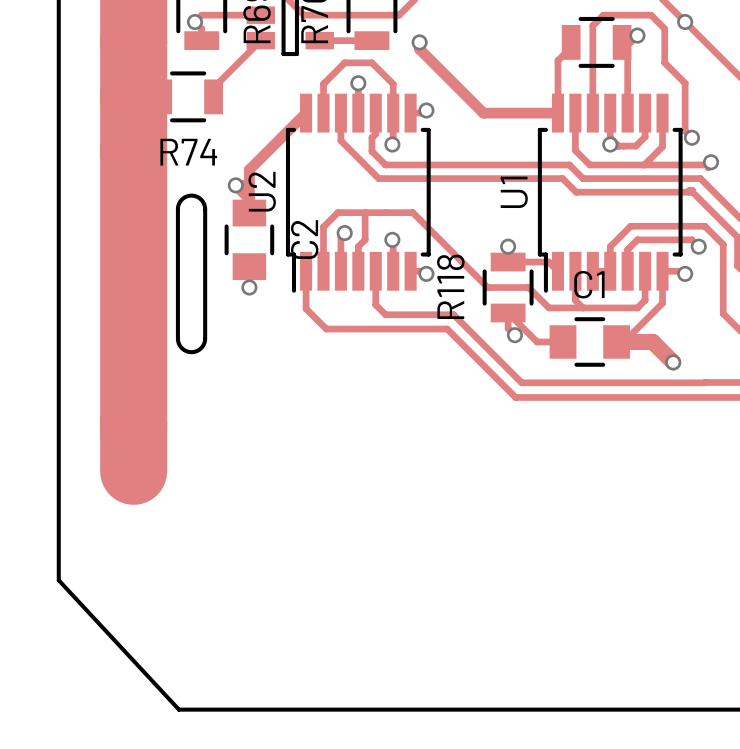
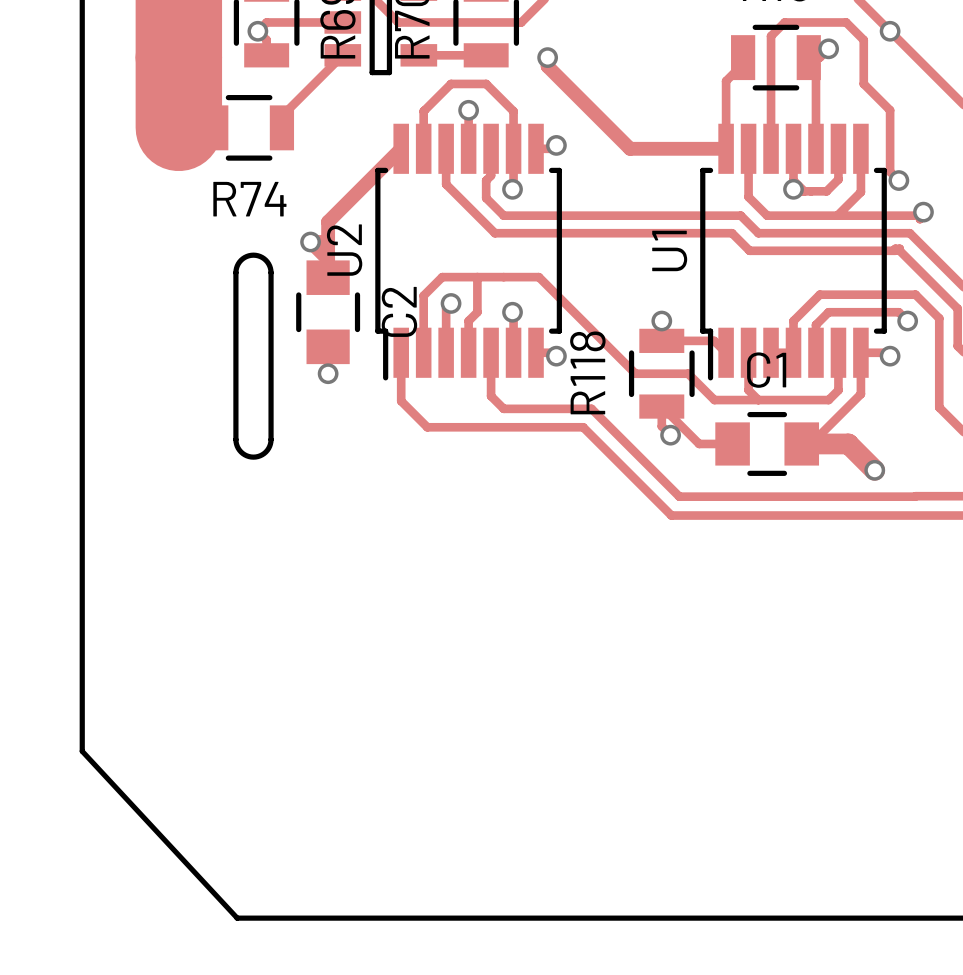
track: (133, 96) (133, 471) -> none

